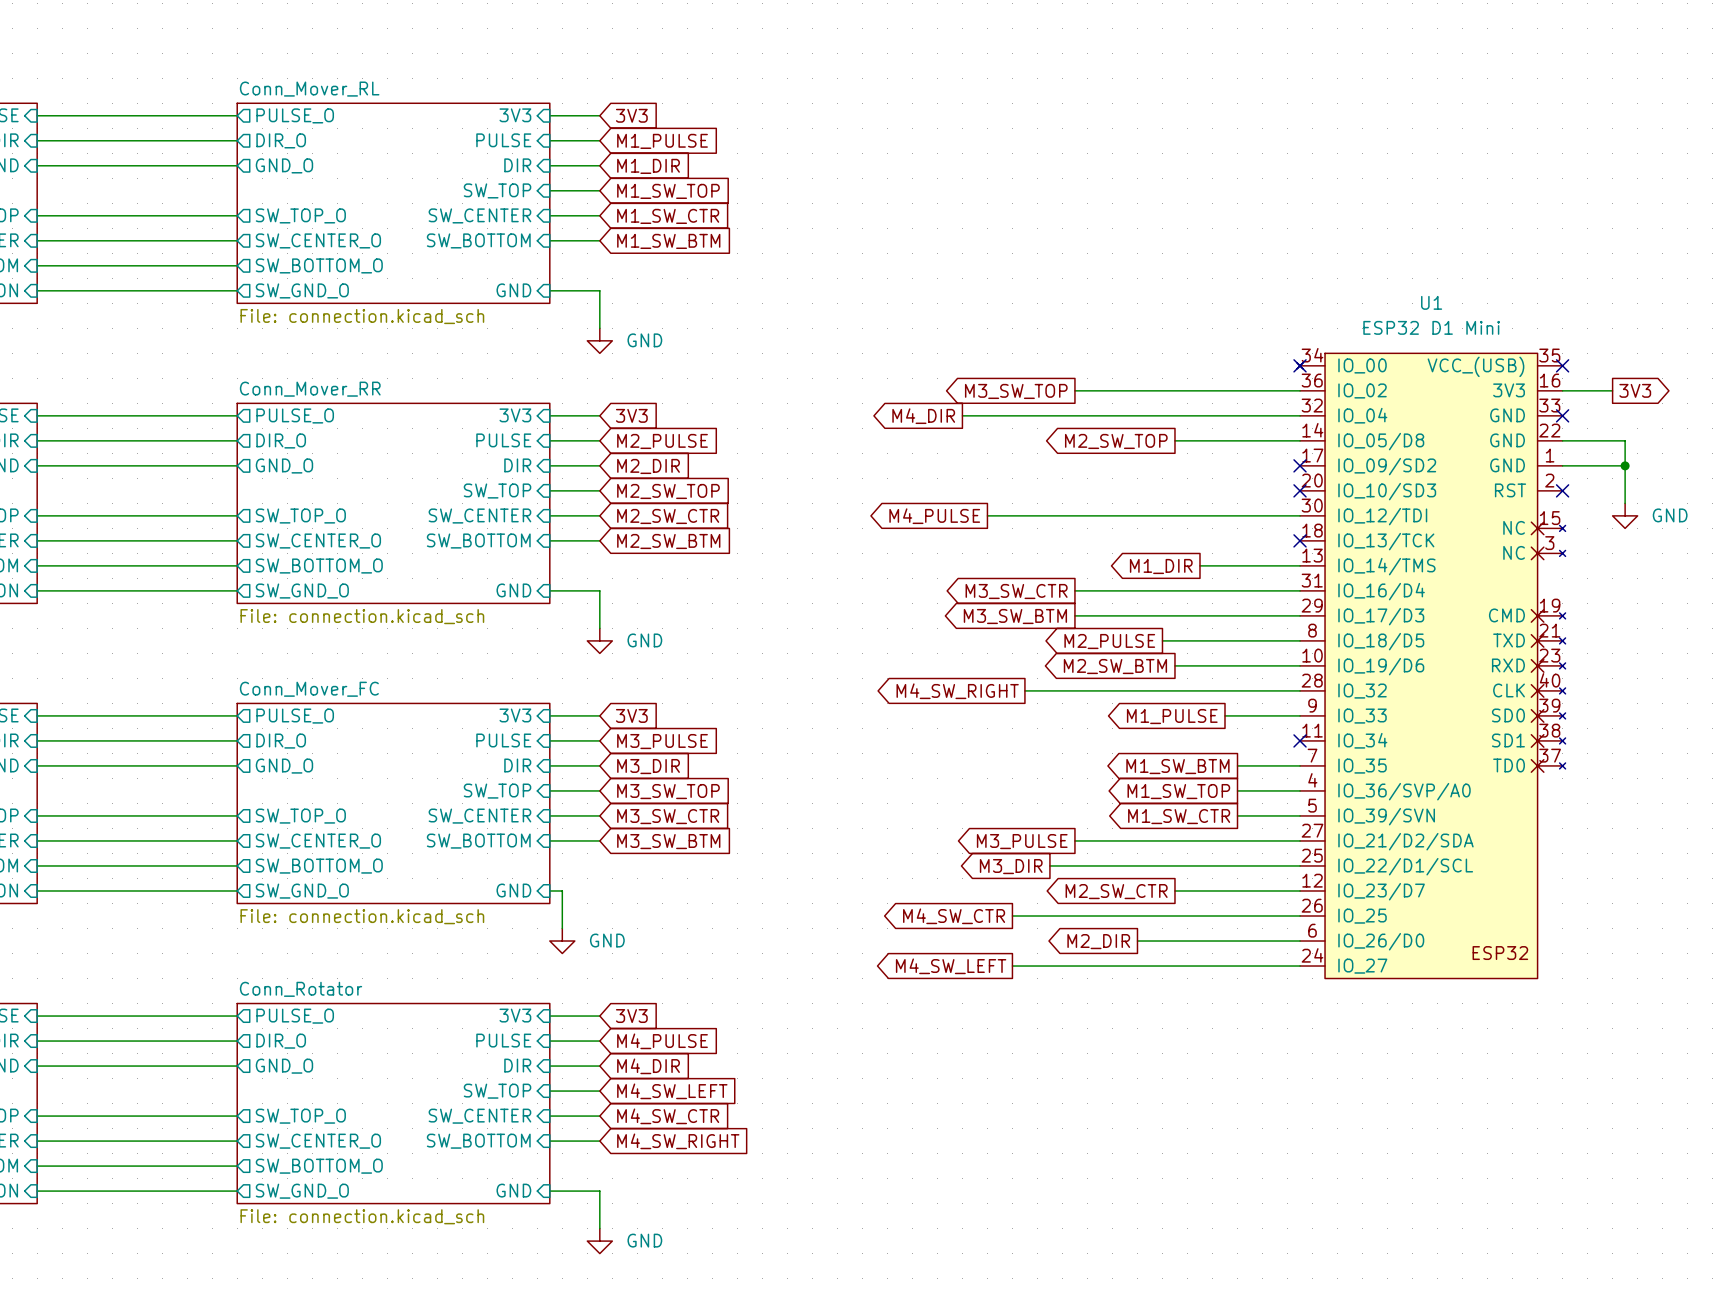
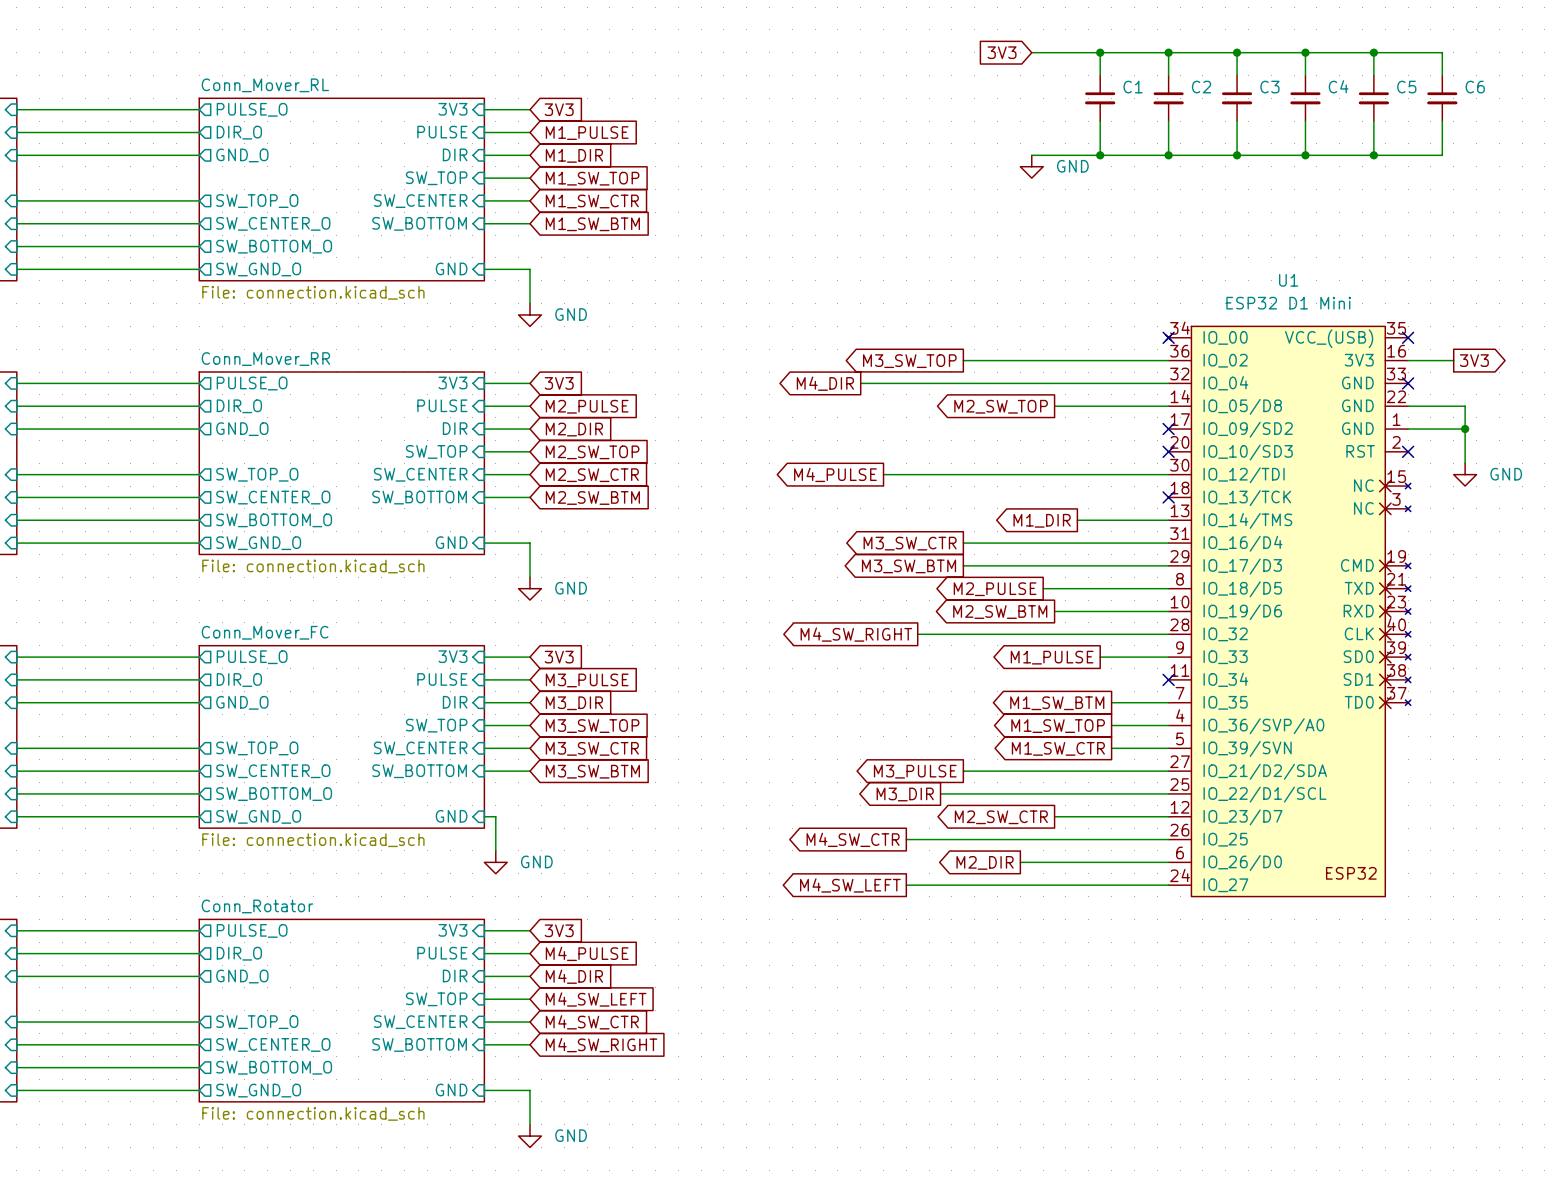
global label: none -> 3V3 (1002, 52)
wire: none -> (1031, 52) (1442, 52) (1442, 75)
wire: none -> (1100, 52) (1100, 75)
junction: none -> (1100, 52)
wire: none -> (1168, 52) (1168, 75)
junction: none -> (1168, 52)
wire: none -> (1237, 52) (1237, 75)
junction: none -> (1237, 52)
wire: none -> (1305, 52) (1305, 75)
junction: none -> (1305, 52)
wire: none -> (1373, 52) (1373, 75)
junction: none -> (1373, 52)
C1: none -> (1100, 98)
C2: none -> (1168, 98)
C3: none -> (1237, 98)
C4: none -> (1305, 98)
C5: none -> (1373, 98)
C6: none -> (1442, 98)
wire: none -> (1100, 121) (1100, 155)
wire: none -> (1168, 121) (1168, 155)
wire: none -> (1237, 121) (1237, 155)
wire: none -> (1305, 121) (1305, 155)
wire: none -> (1373, 121) (1373, 155)
wire: none -> (1442, 121) (1442, 155) (1031, 155)
junction: none -> (1100, 155)
junction: none -> (1168, 155)
junction: none -> (1237, 155)
junction: none -> (1305, 155)
junction: none -> (1373, 155)
power symbol: none -> GND (1031, 166)

